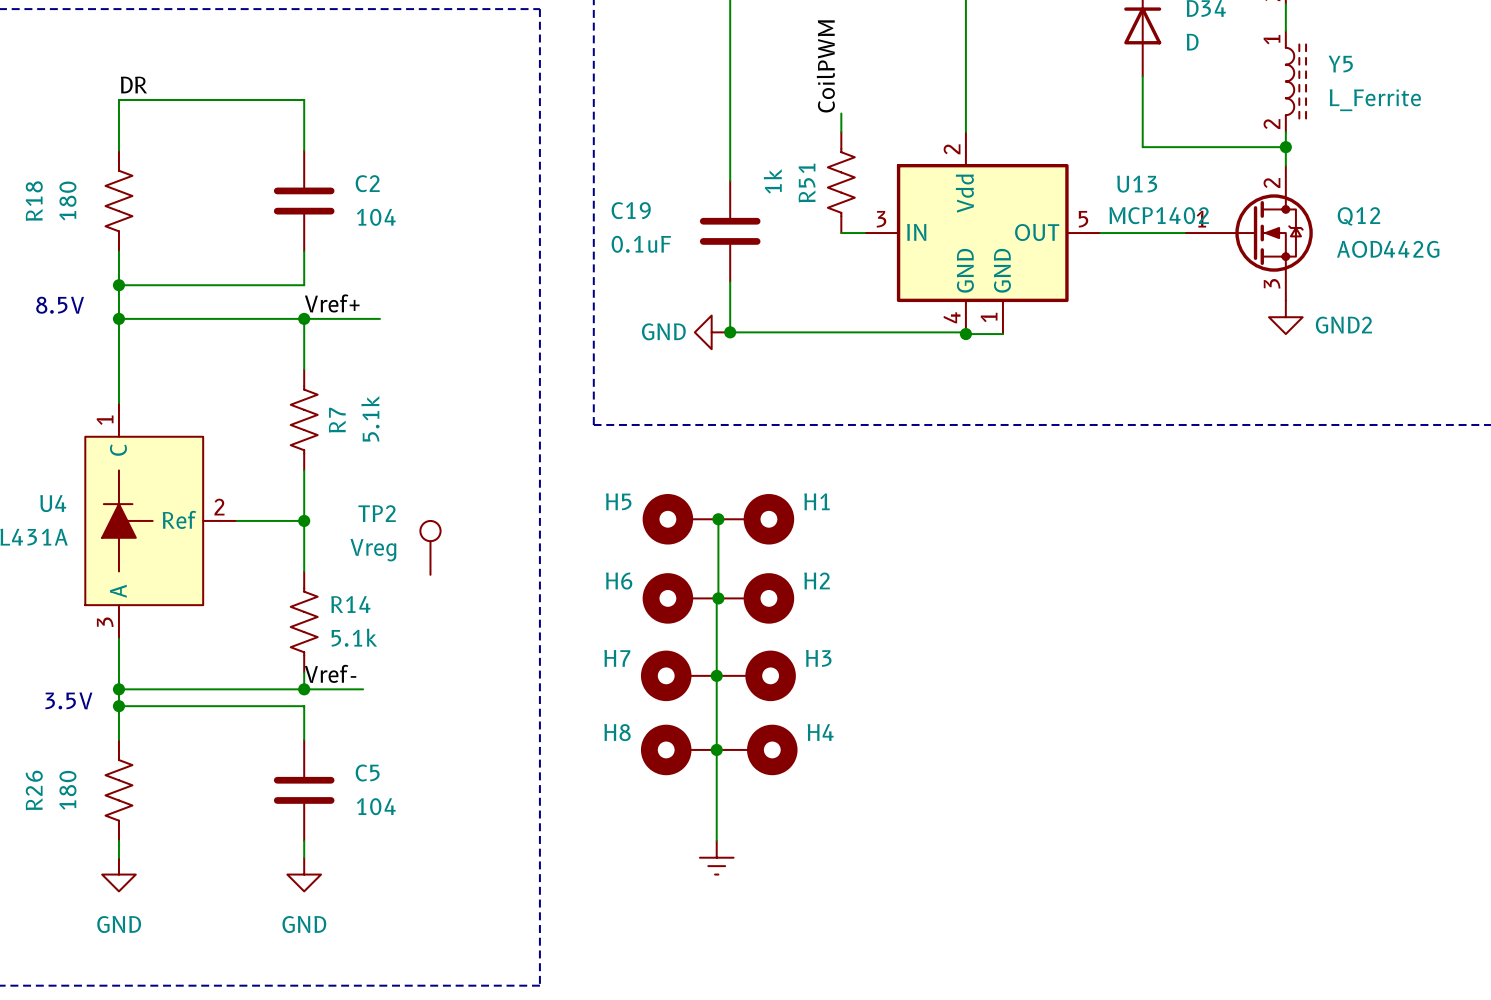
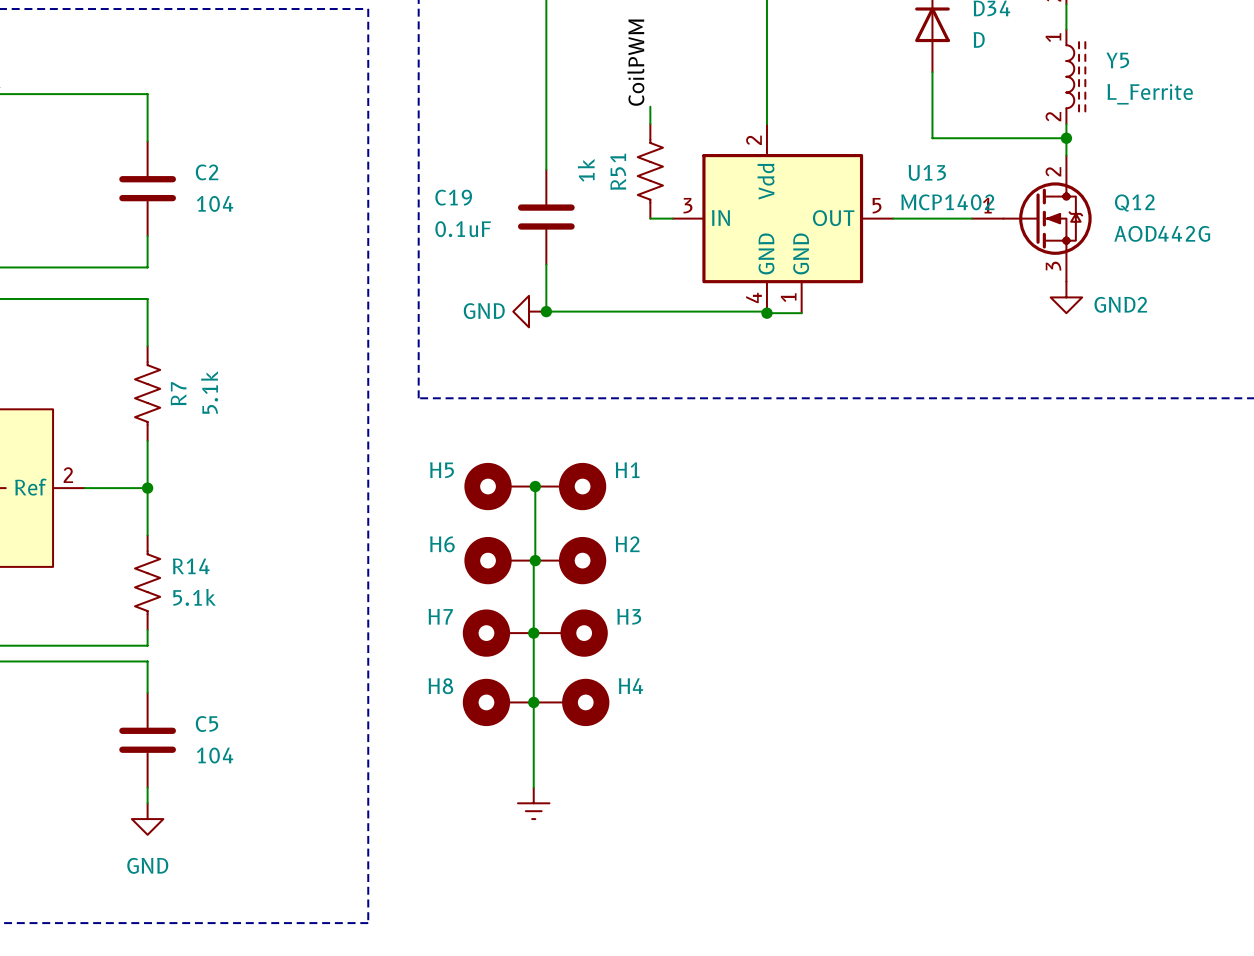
label: Vref+ (332, 303) -> none
wire: (304, 318) (379, 318) -> none
junction: (304, 318) -> none
TP2: Vreg (430, 547) -> none
label: Vref- (330, 673) -> none
wire: (304, 689) (363, 689) -> none
junction: (304, 689) -> none

